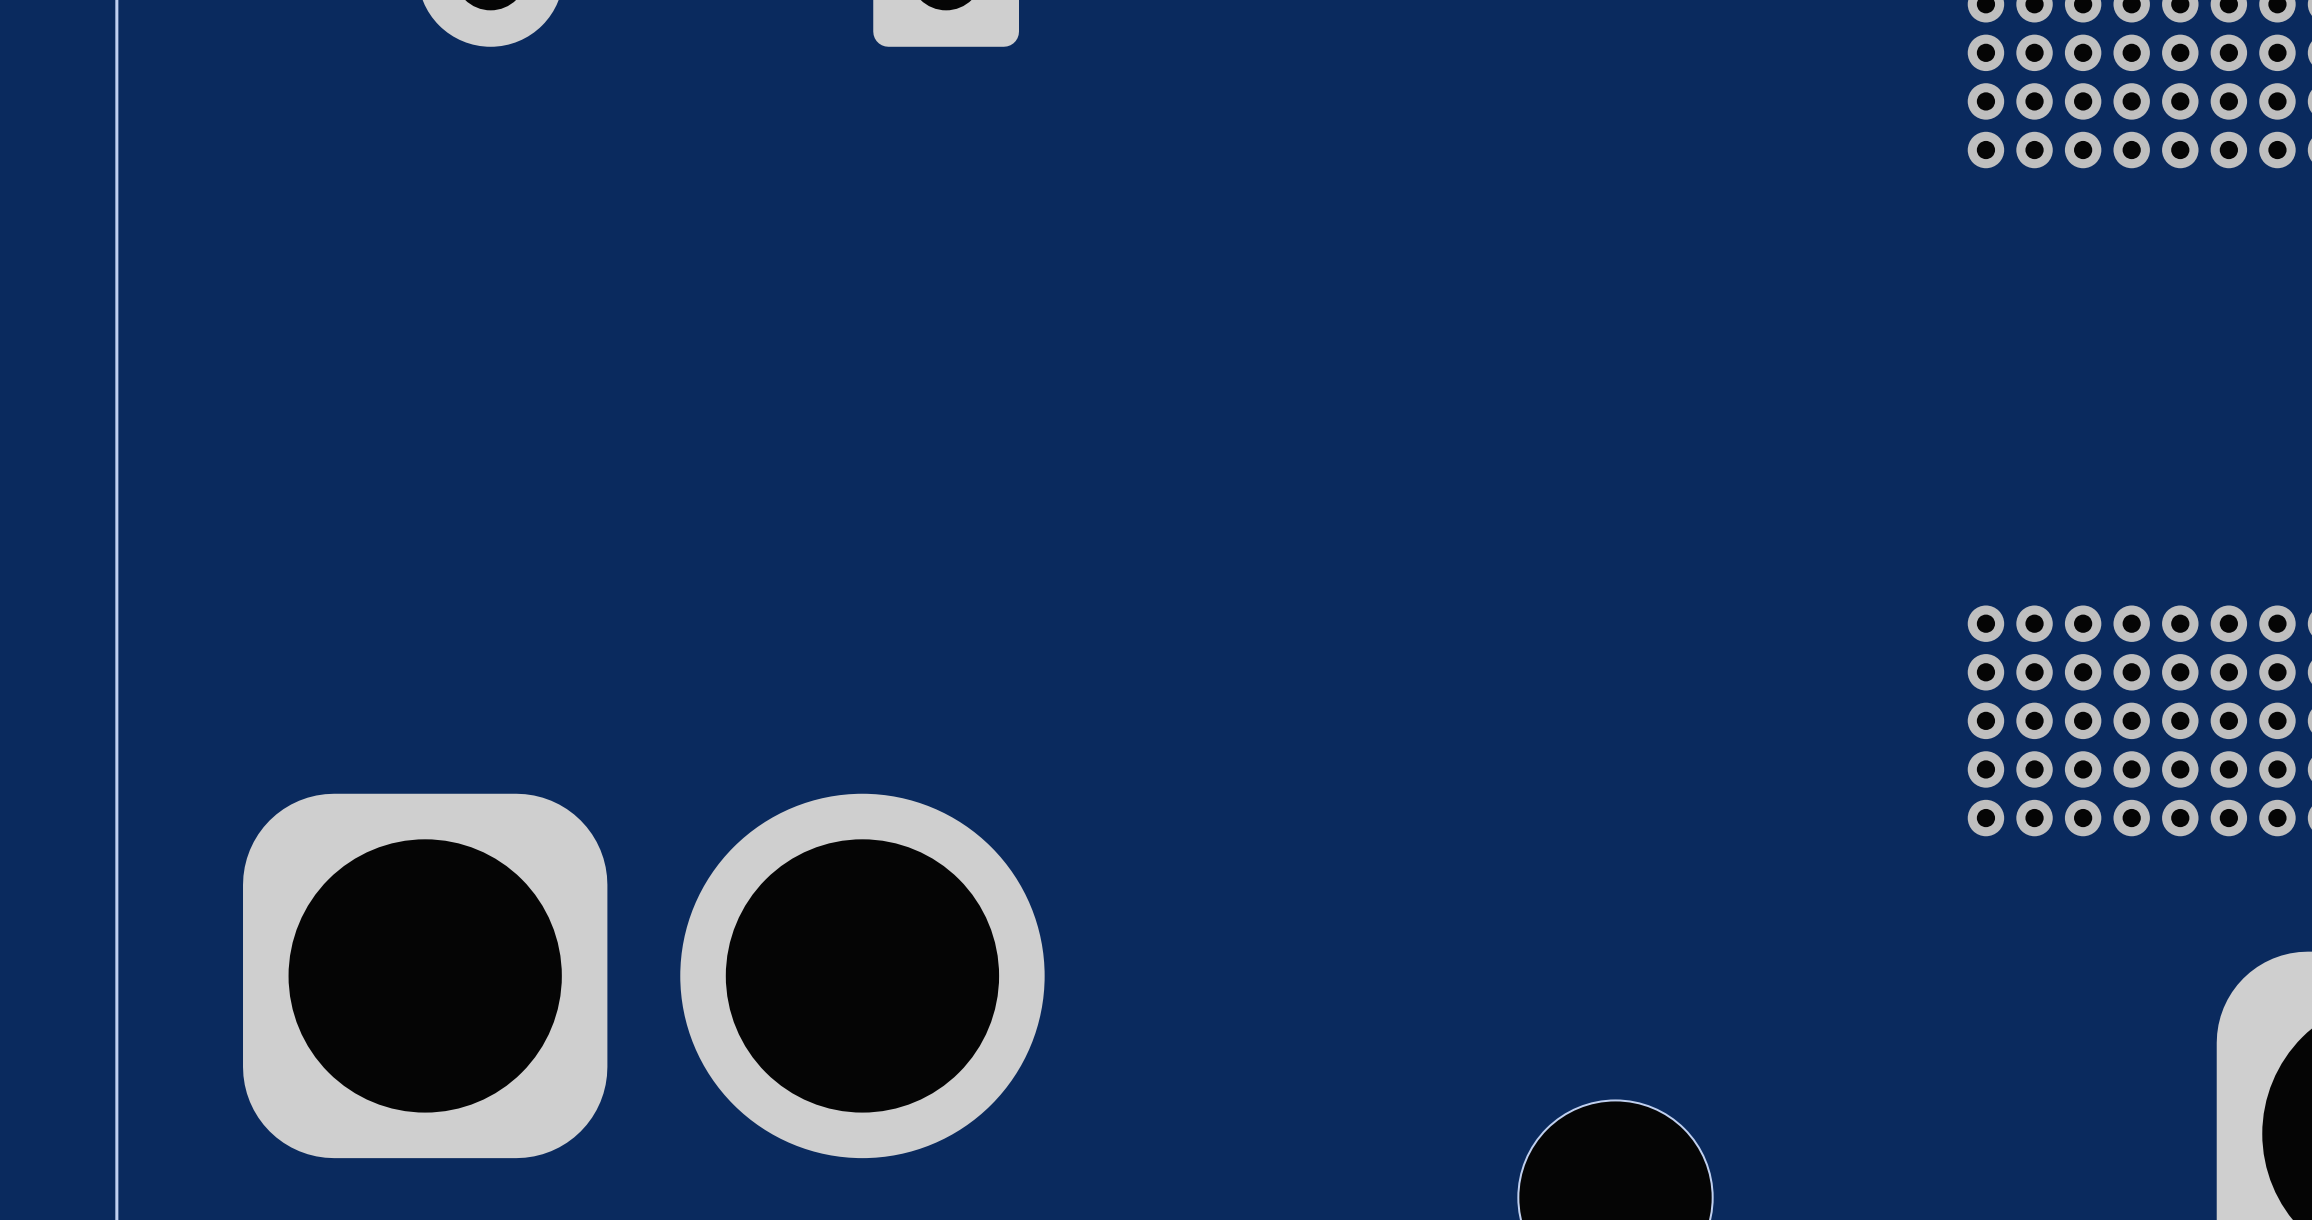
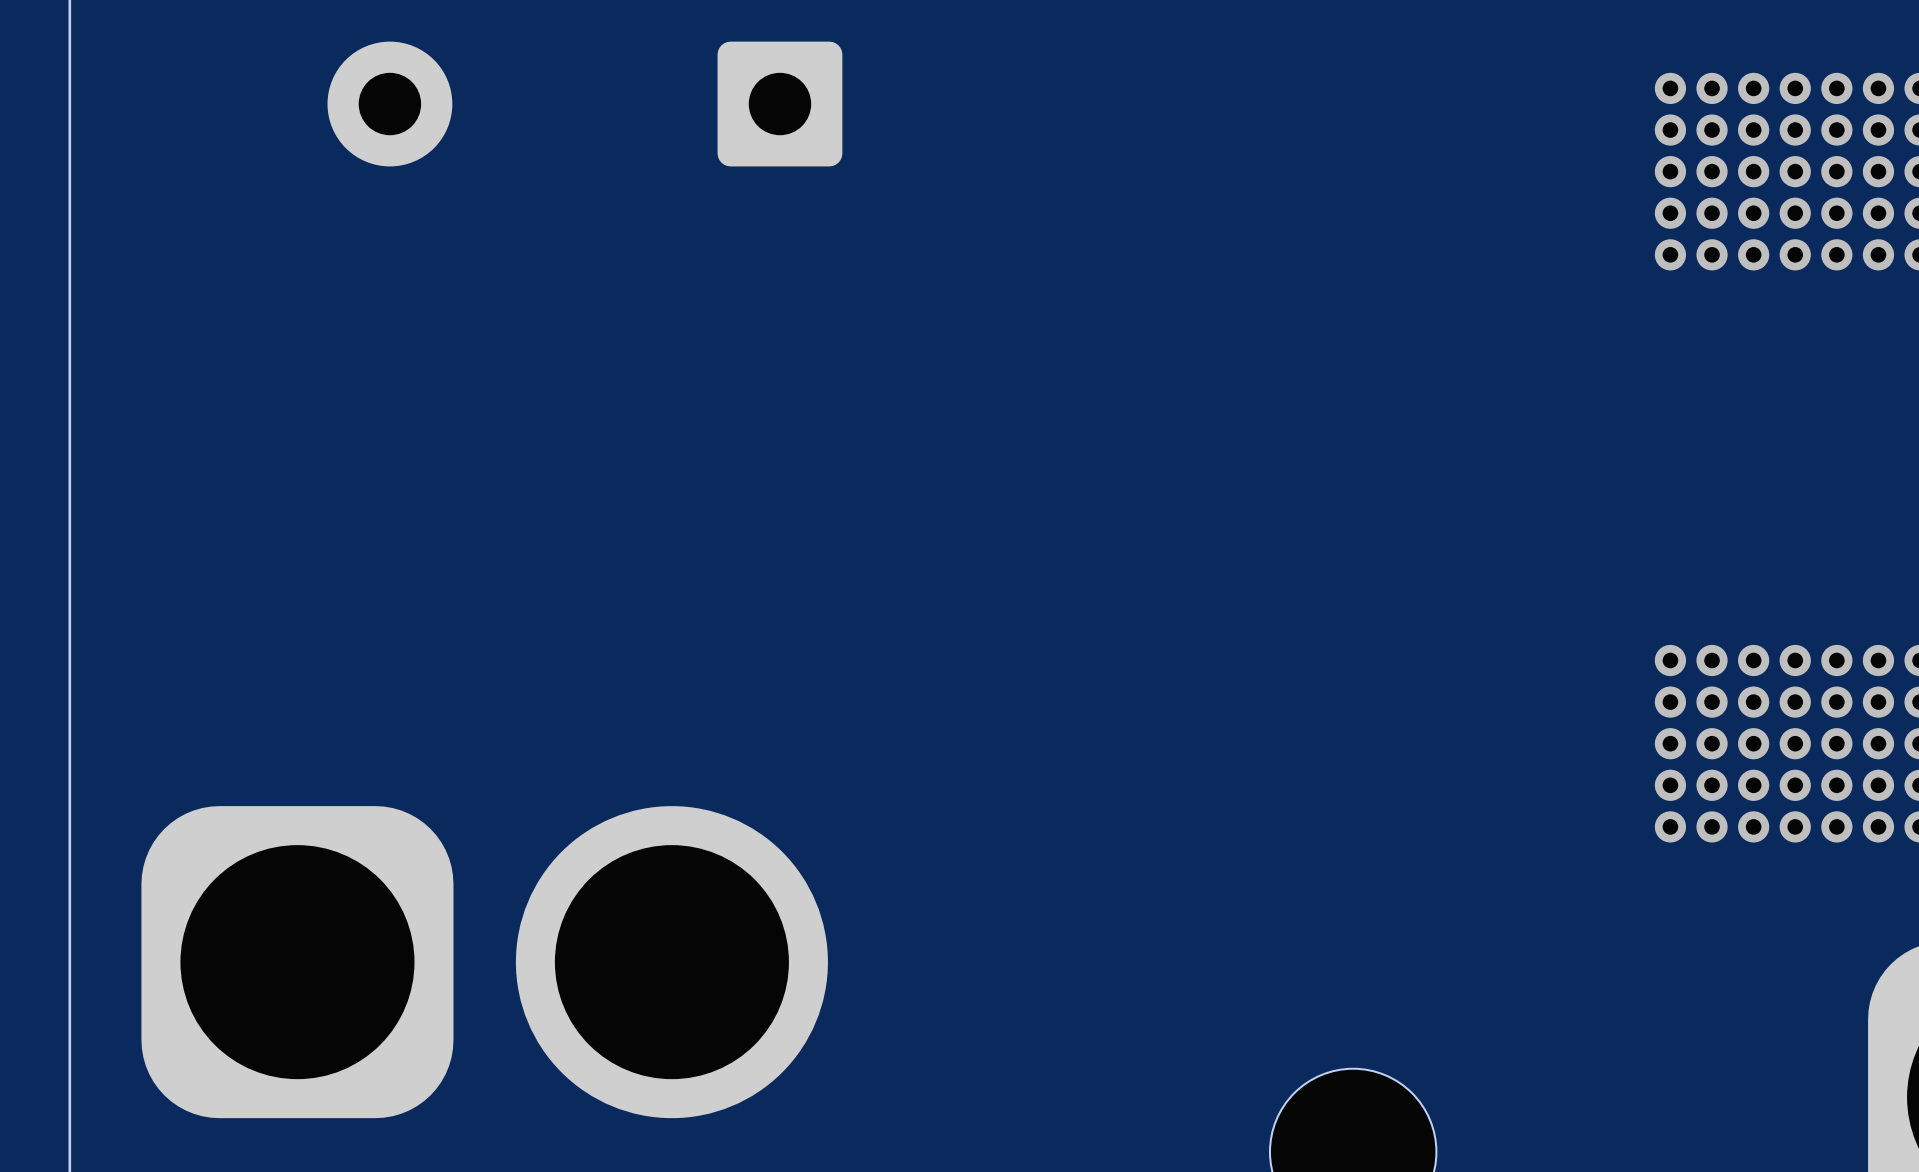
part position: (643, 975) -> (484, 962)

